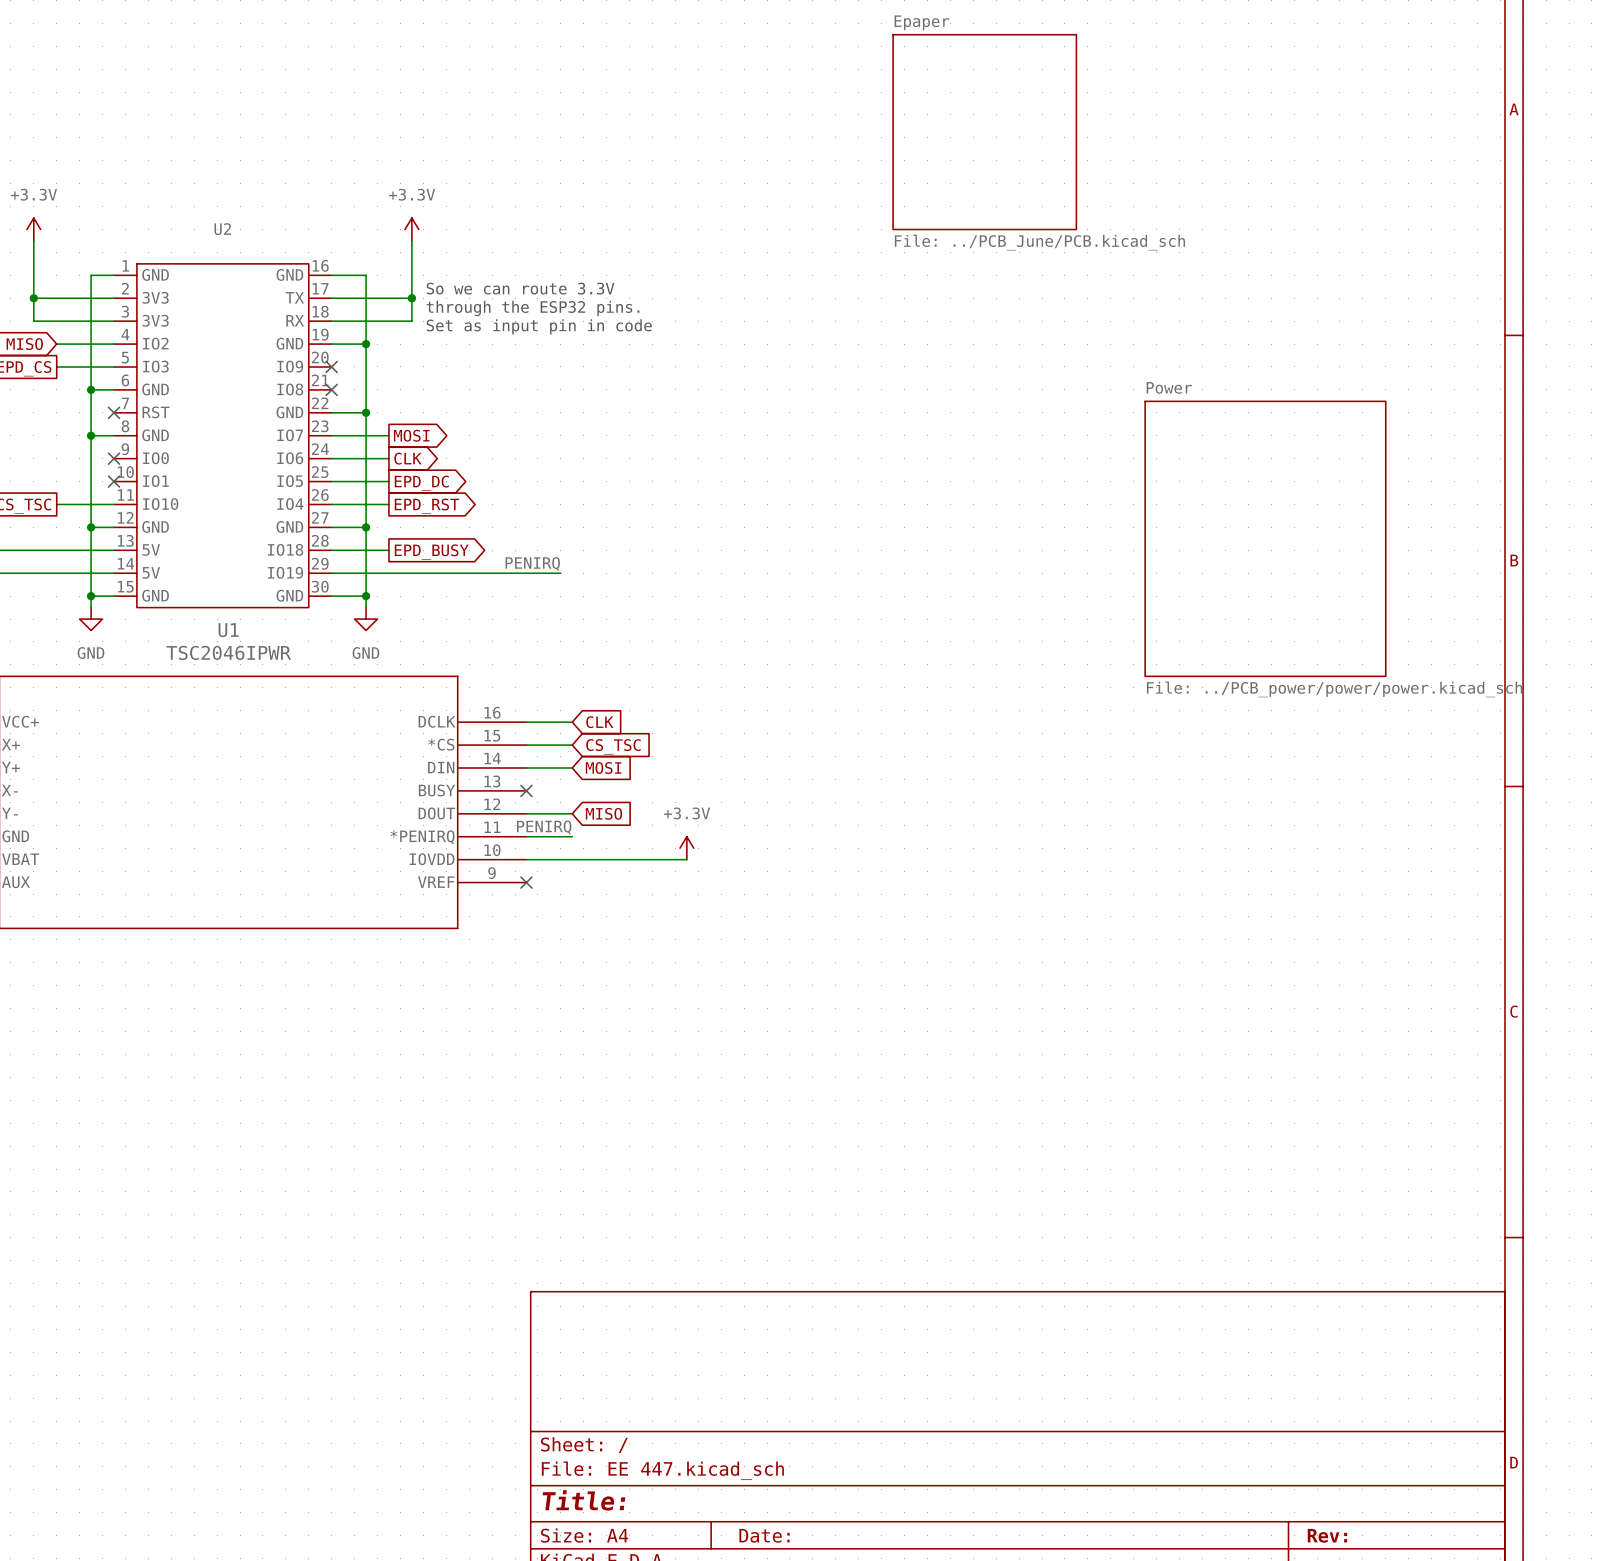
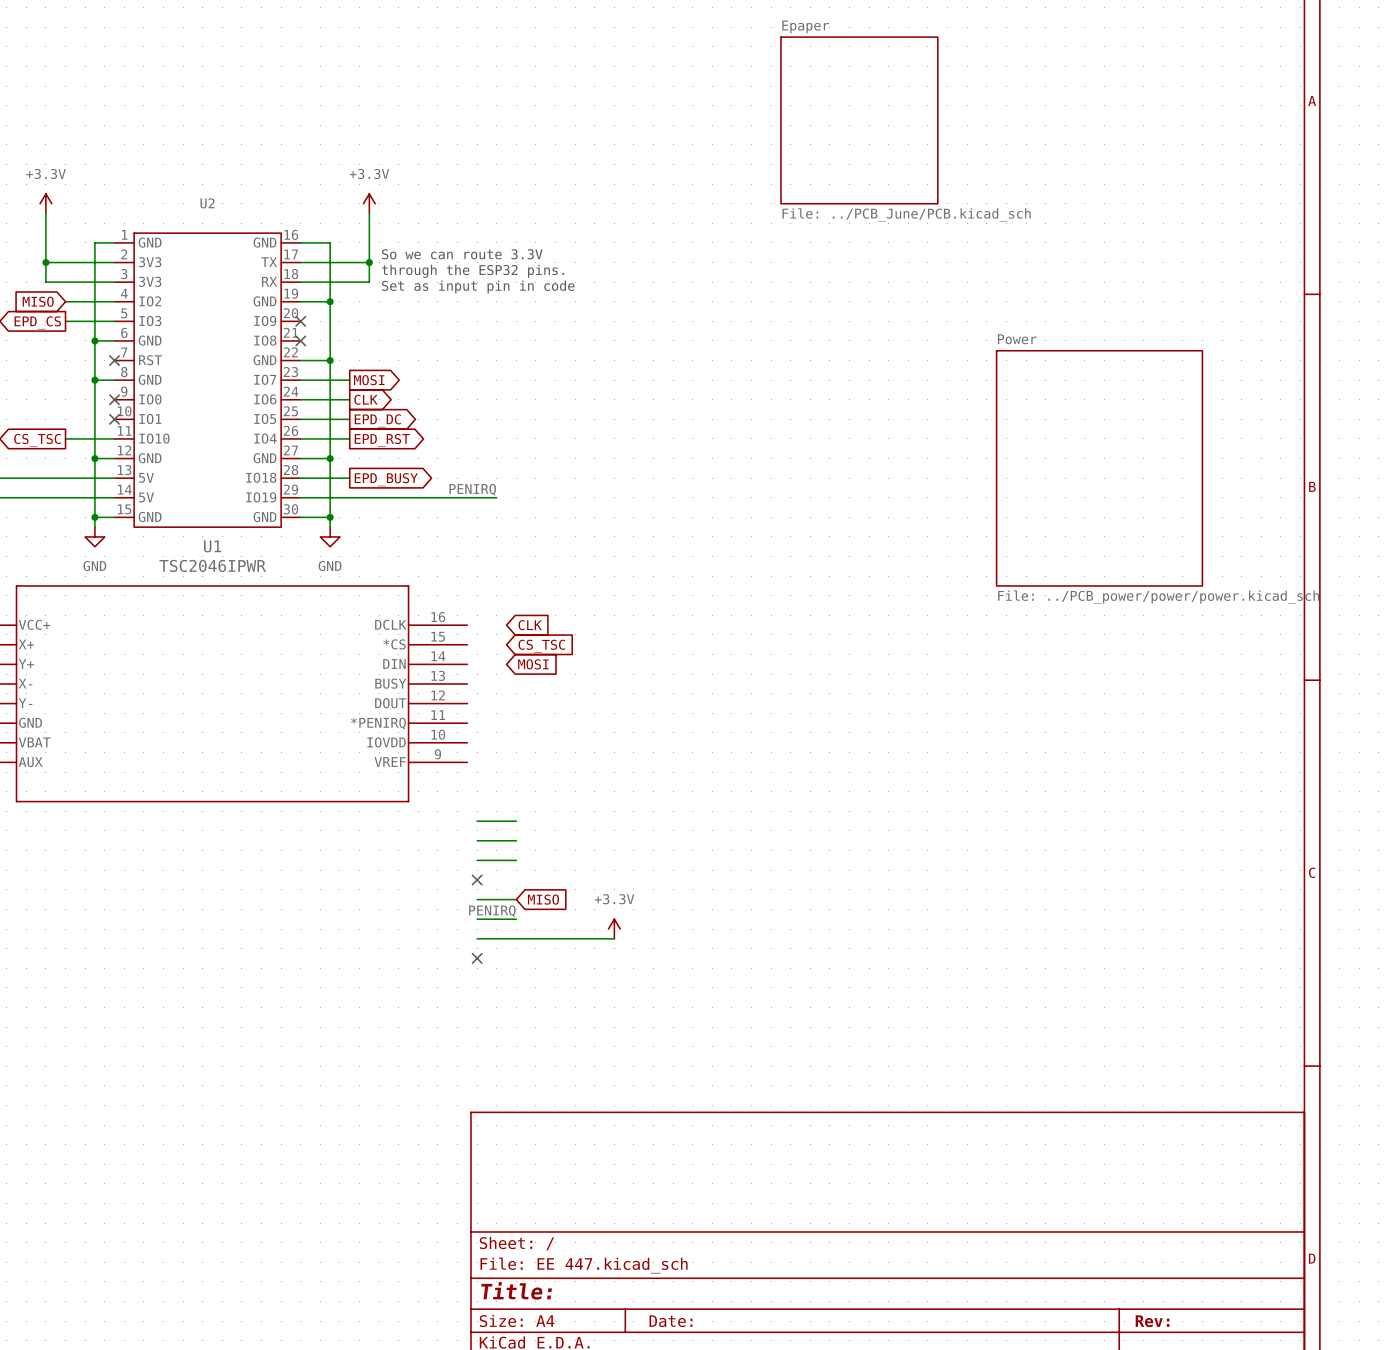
wire: (526, 722) (572, 722) -> none
wire: (526, 745) (572, 745) -> (477, 821) (516, 821)
wire: (526, 767) (572, 767) -> (477, 840) (516, 840)
no-connect mark: (526, 790) -> none
wire: (526, 813) (572, 813) -> (477, 860) (516, 860)
global label: MISO (603, 813) -> none
label: PENIRQ (544, 827) -> none
wire: (526, 836) (572, 836) -> (477, 899) (516, 899)
power symbol: +3.3V (686, 848) -> none
wire: (526, 859) (686, 859) -> none
no-connect mark: (526, 882) -> none
no-connect mark: none -> (477, 880)
global label: none -> MISO (543, 899)
label: none -> PENIRQ (492, 911)
wire: none -> (477, 919) (516, 919)
power symbol: none -> +3.3V (614, 929)
wire: none -> (477, 938) (614, 938)
no-connect mark: none -> (477, 958)

